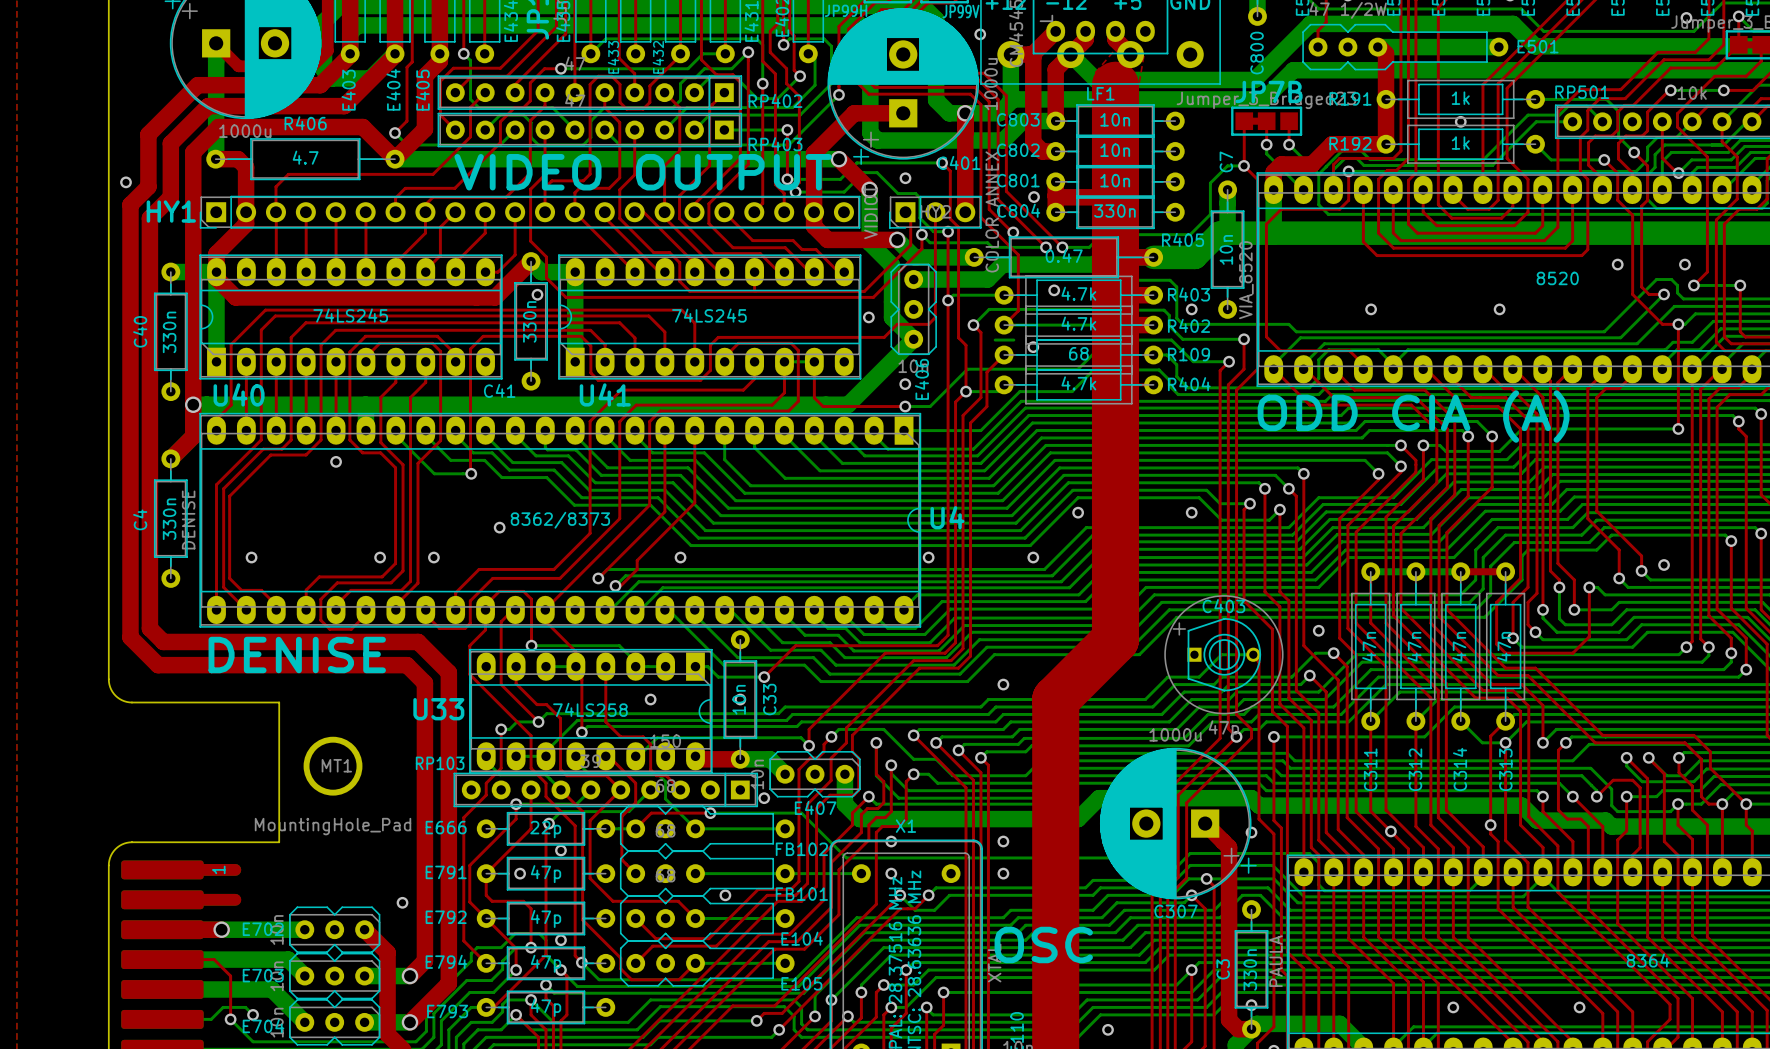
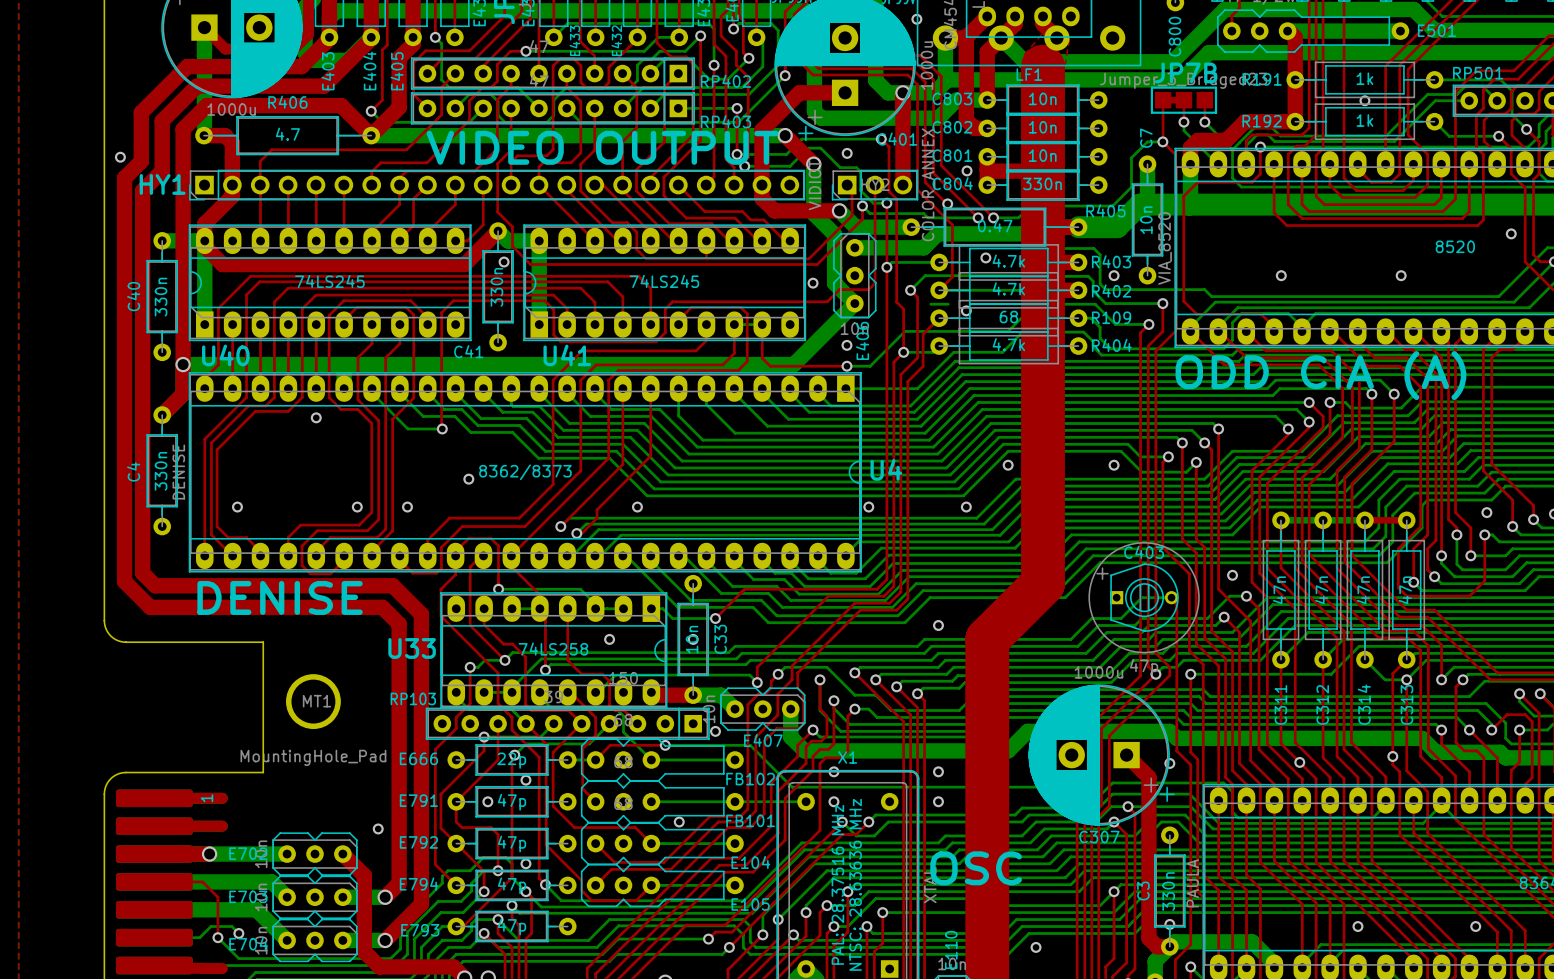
via: none -> (1486, 512)

